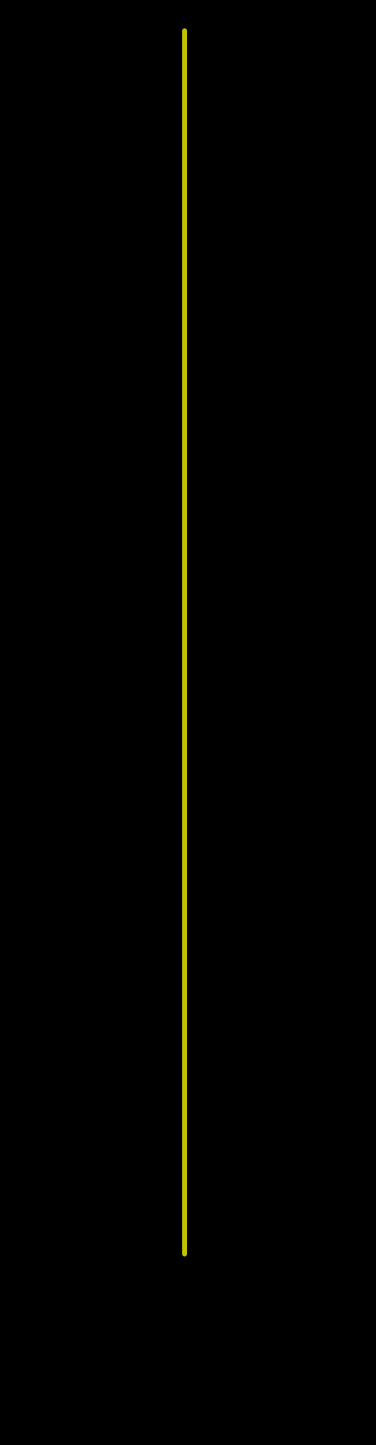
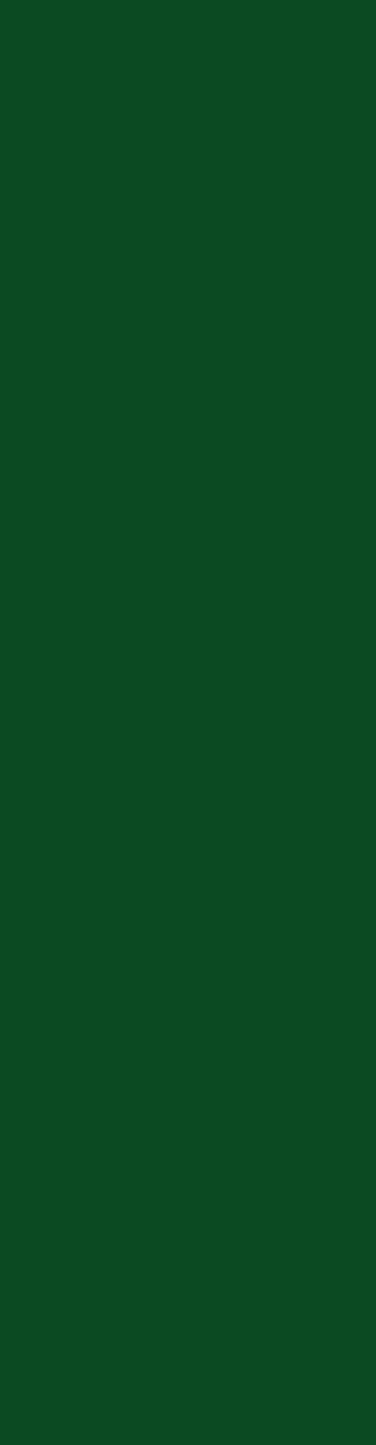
board edge: (184, 30) (184, 1254) -> none

